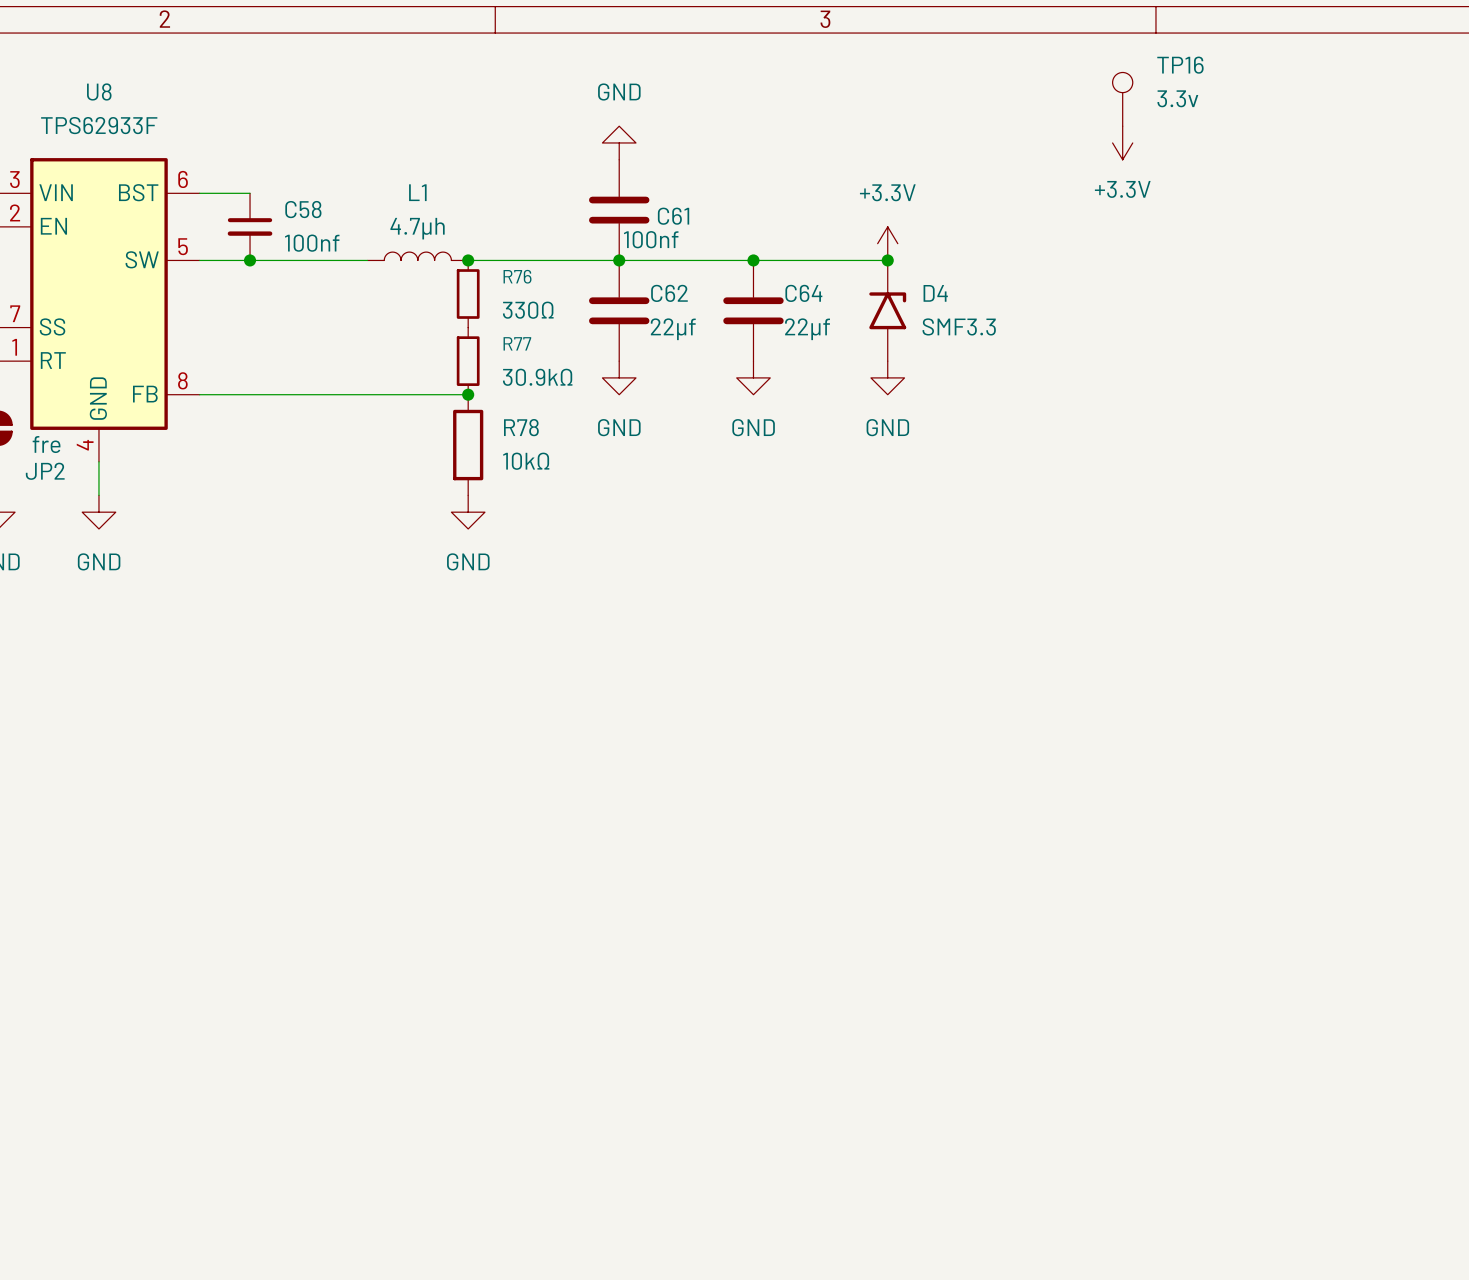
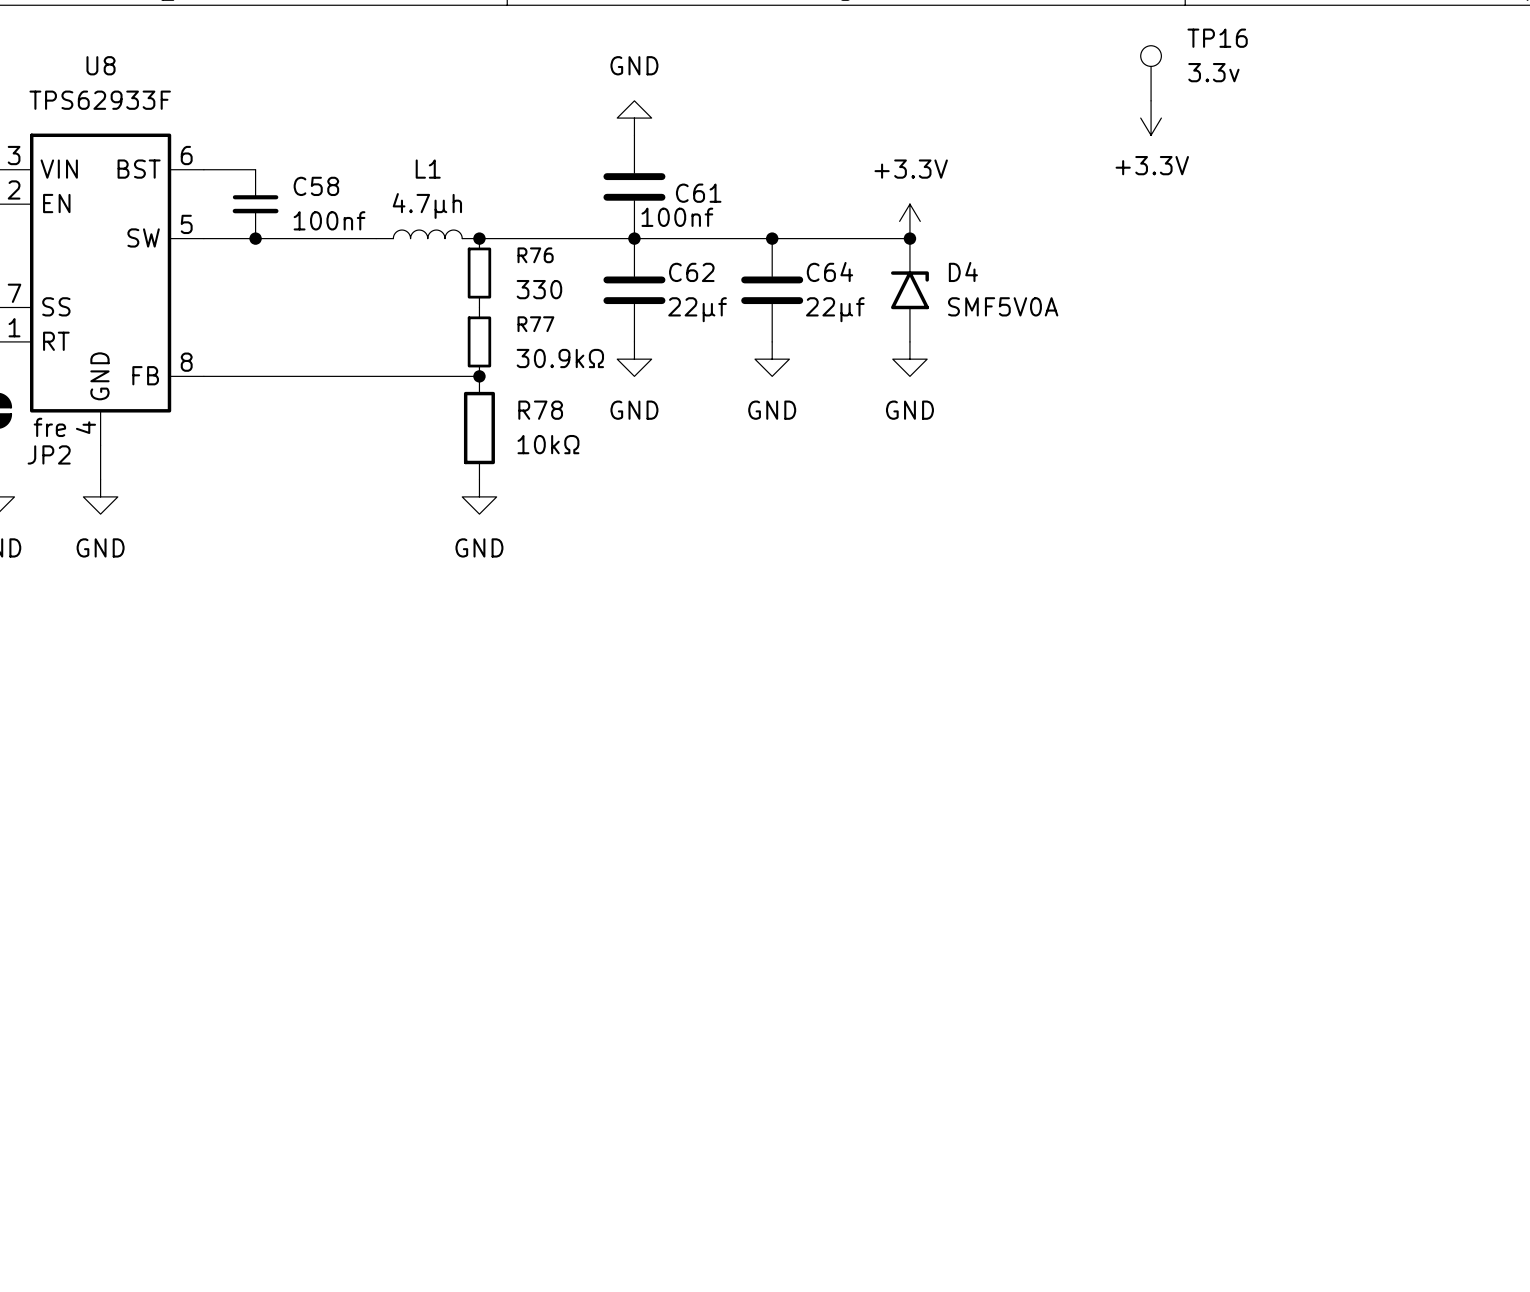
R76 value: 330Ω (528, 310) -> 330 (539, 289)
D4 value: SMF3.3 (959, 326) -> SMF5V0A (1003, 306)

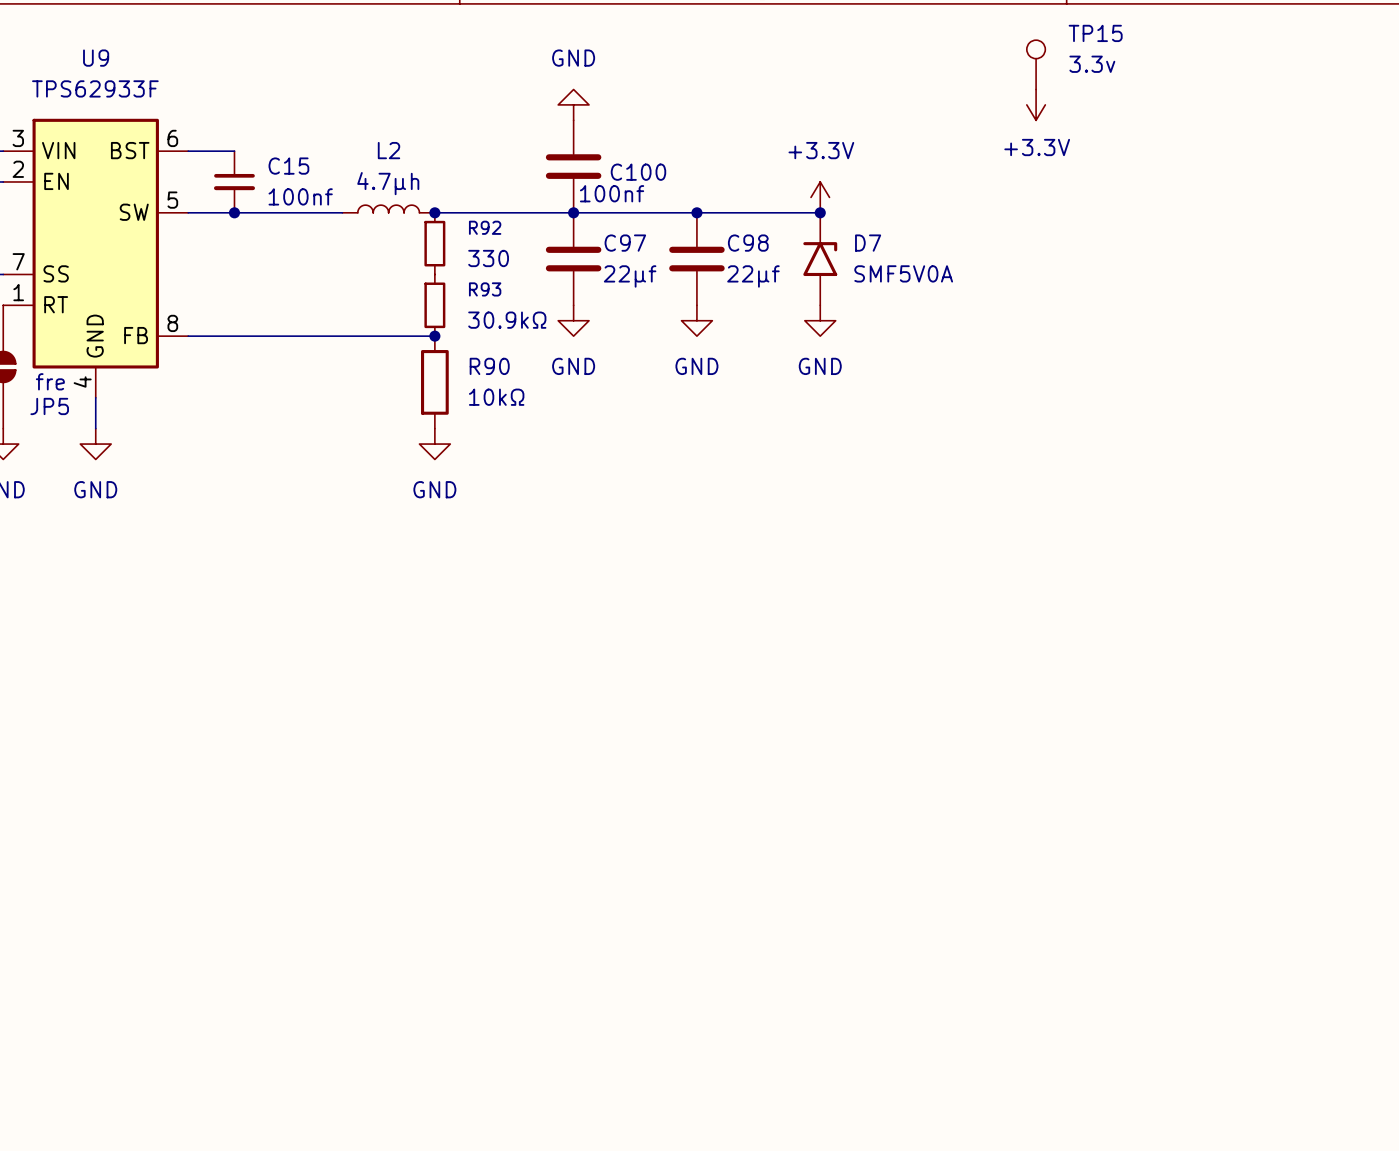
TP16 name: TP16 (1217, 38) -> TP15 (1095, 33)
U8 name: U8 (101, 65) -> U9 (96, 58)
L1 name: L1 (428, 169) -> L2 (389, 150)
C58 name: C58 (316, 186) -> C15 (288, 166)
C61 name: C61 (698, 193) -> C100 (638, 172)
R76 name: R76 (535, 255) -> R92 (485, 227)
C64 name: C64 (829, 271) -> C98 (748, 243)
D4 name: D4 (963, 271) -> D7 (868, 243)
C62 name: C62 (691, 272) -> C97 (625, 243)
R77 name: R77 (535, 324) -> R93 (485, 289)
R78 name: R78 (540, 410) -> R90 (489, 366)
JP2 name: JP2 (49, 454) -> JP5 (49, 406)

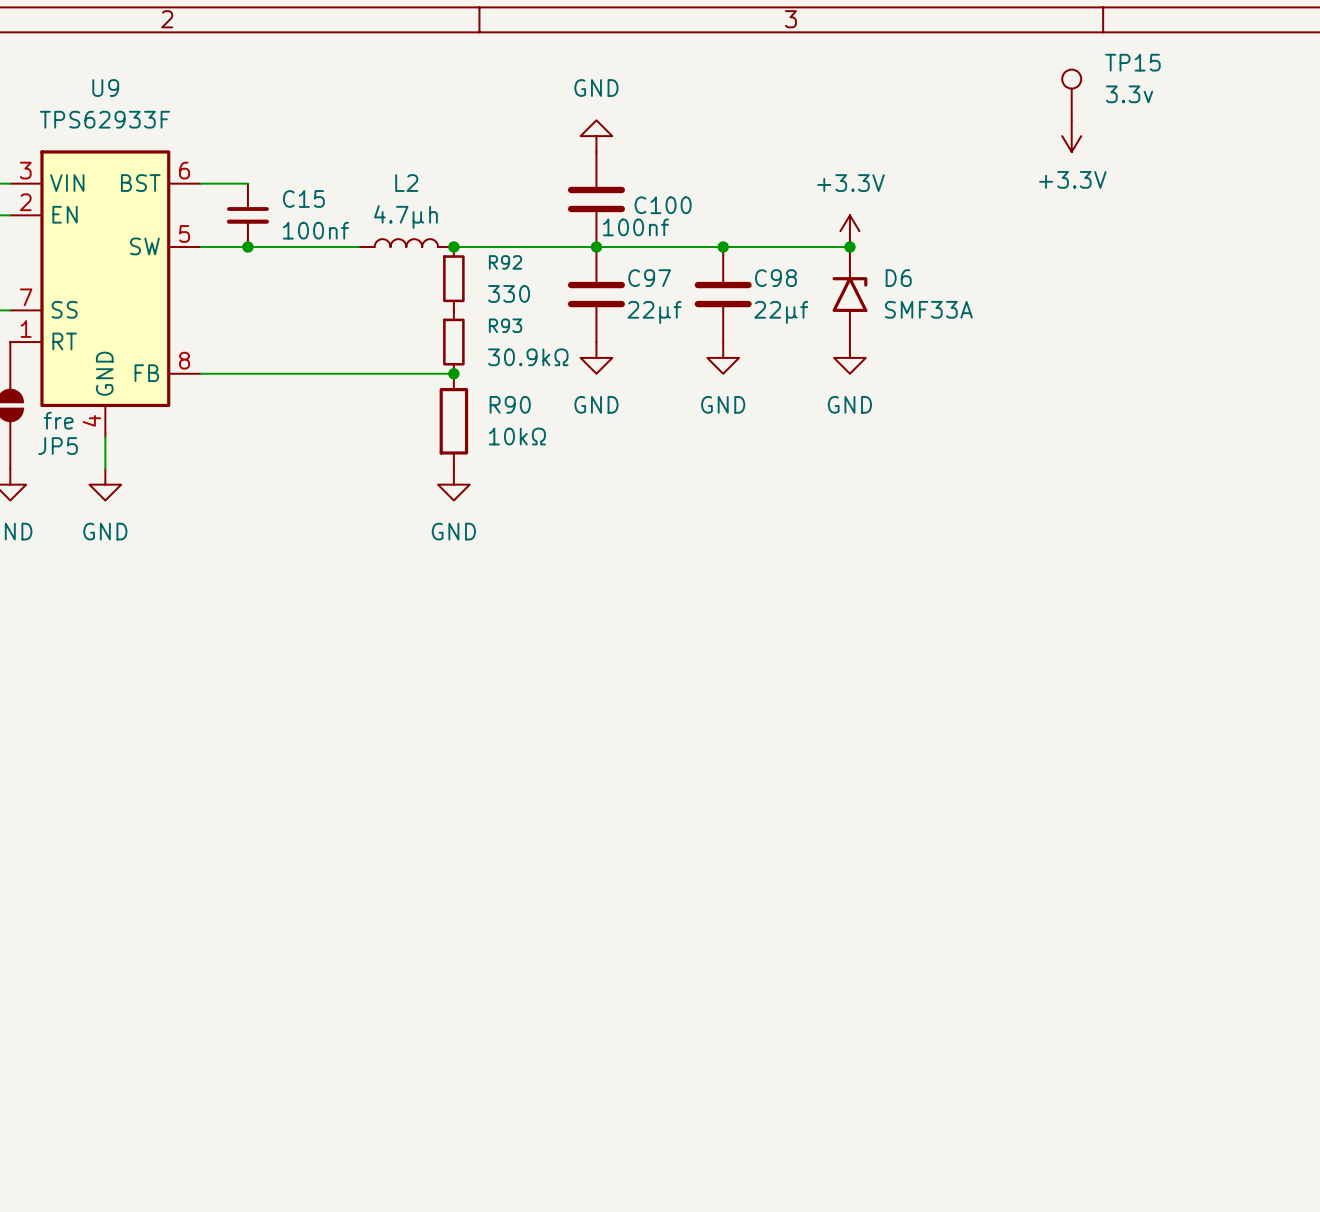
D7 name: D7 (868, 243) -> D6 (898, 278)
D7 value: SMF5V0A (903, 273) -> SMF33A (928, 309)

